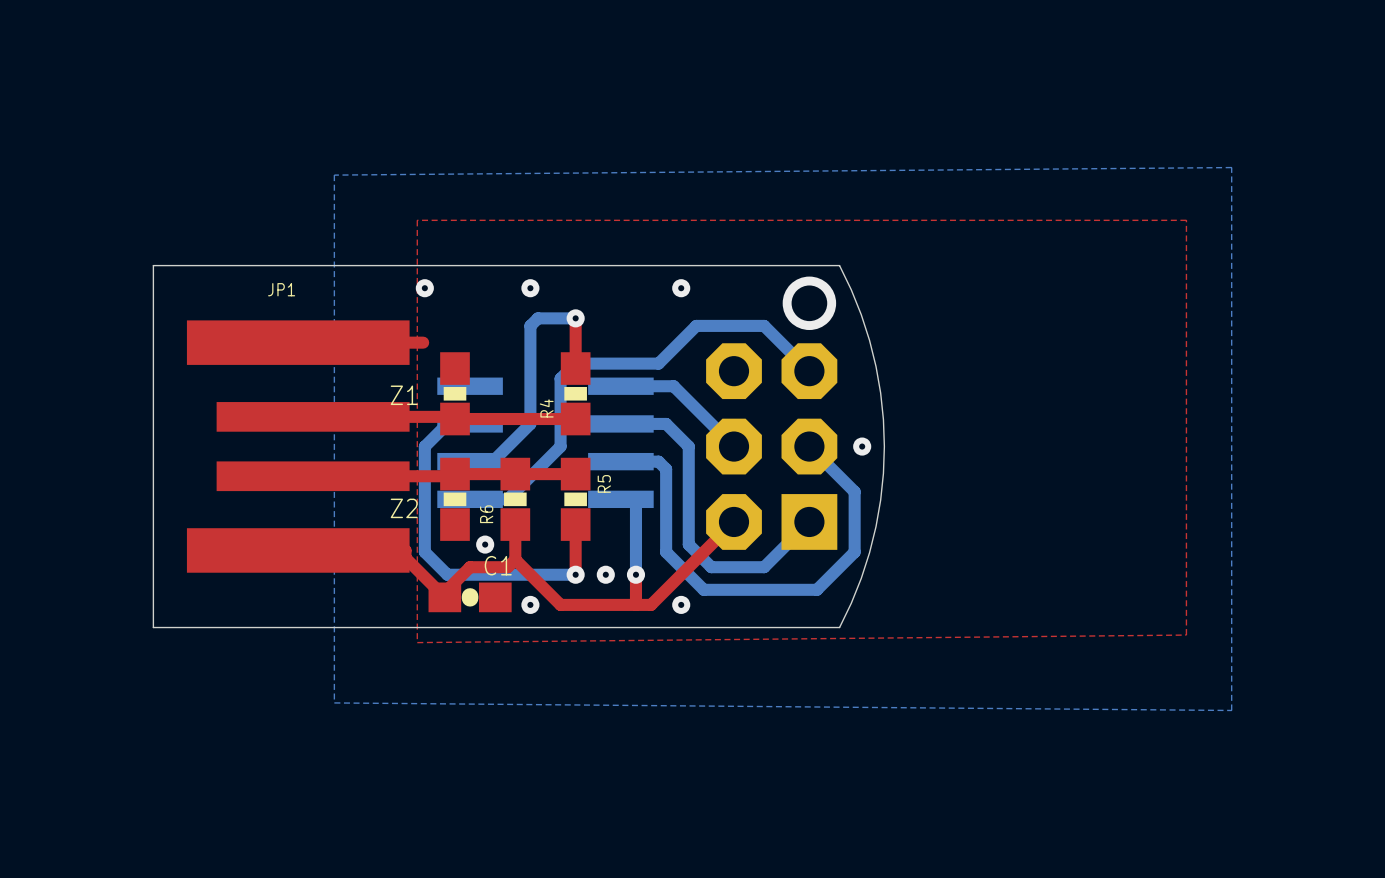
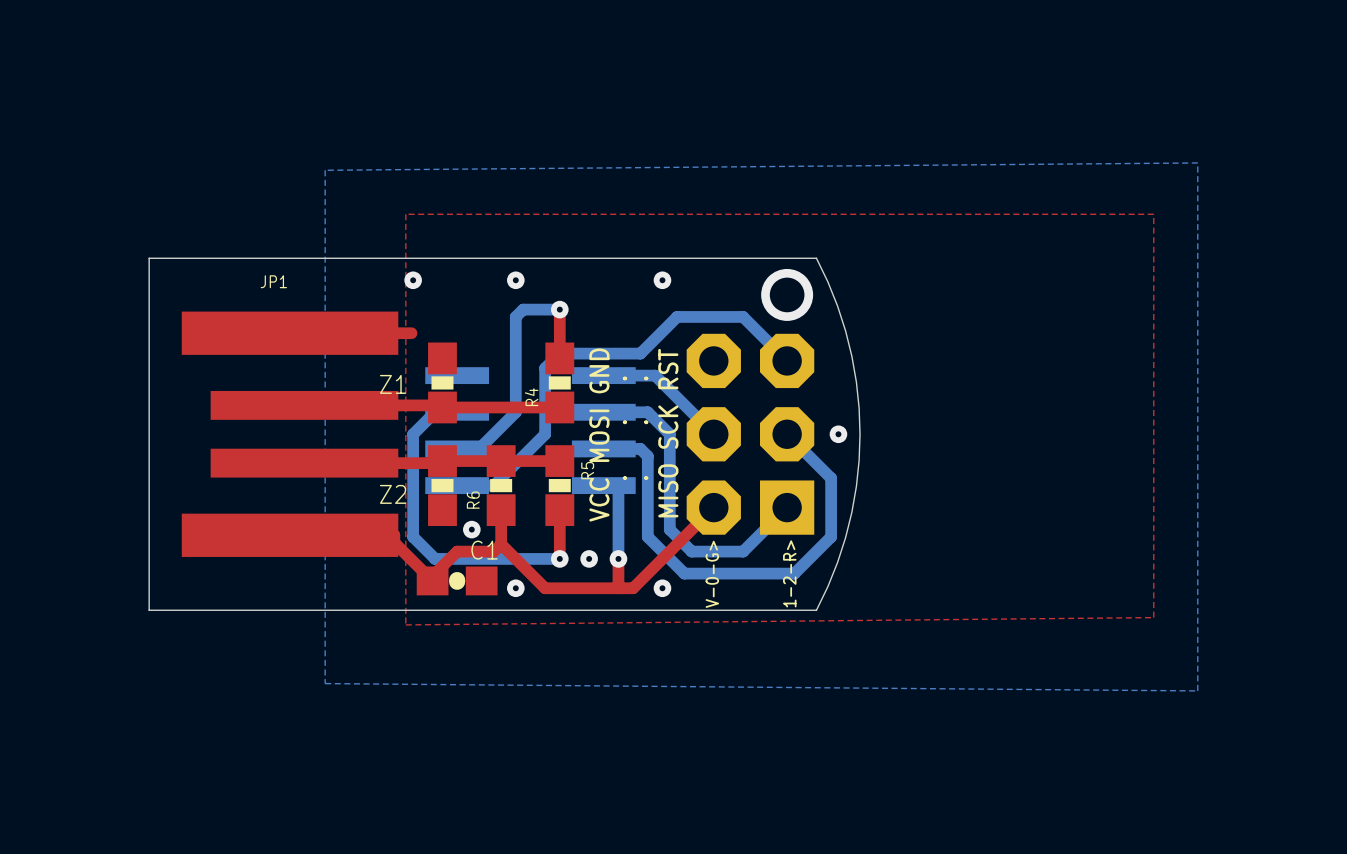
text: none -> . . . (624, 428)
text: none -> . . . (646, 428)
text: none -> MISO SCK RST (668, 433)
text: none -> VCC MOSI GND (599, 435)
text: none -> V-0-G> (712, 574)
text: none -> 1-2-R> (789, 573)

